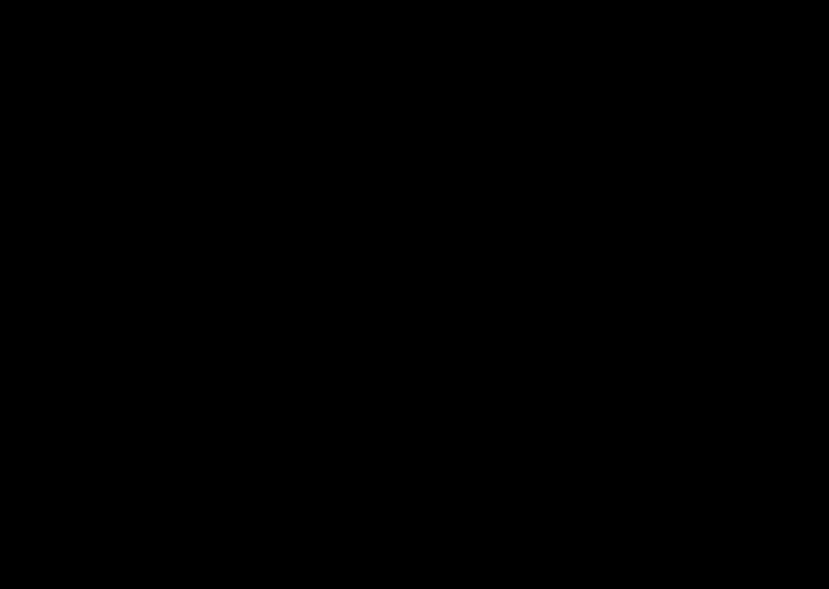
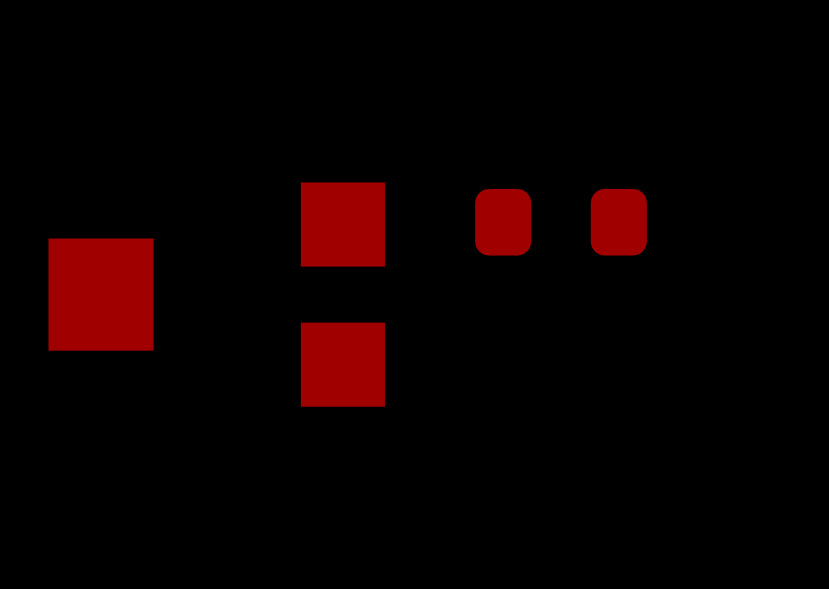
part: none -> (560, 222)
part: none -> (216, 294)

